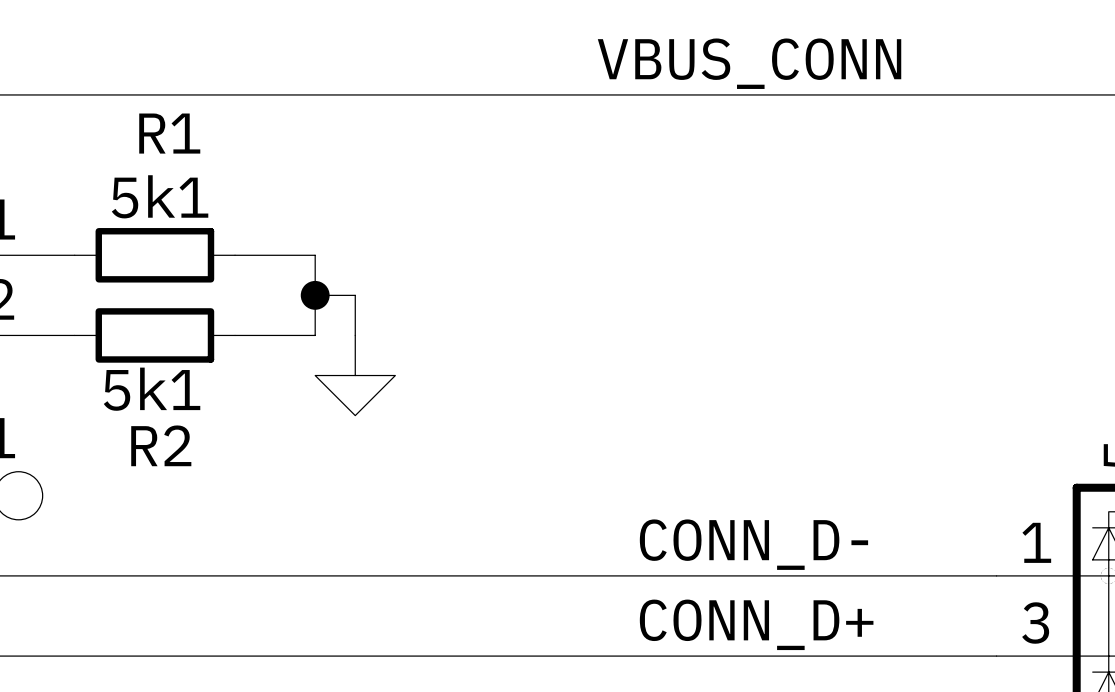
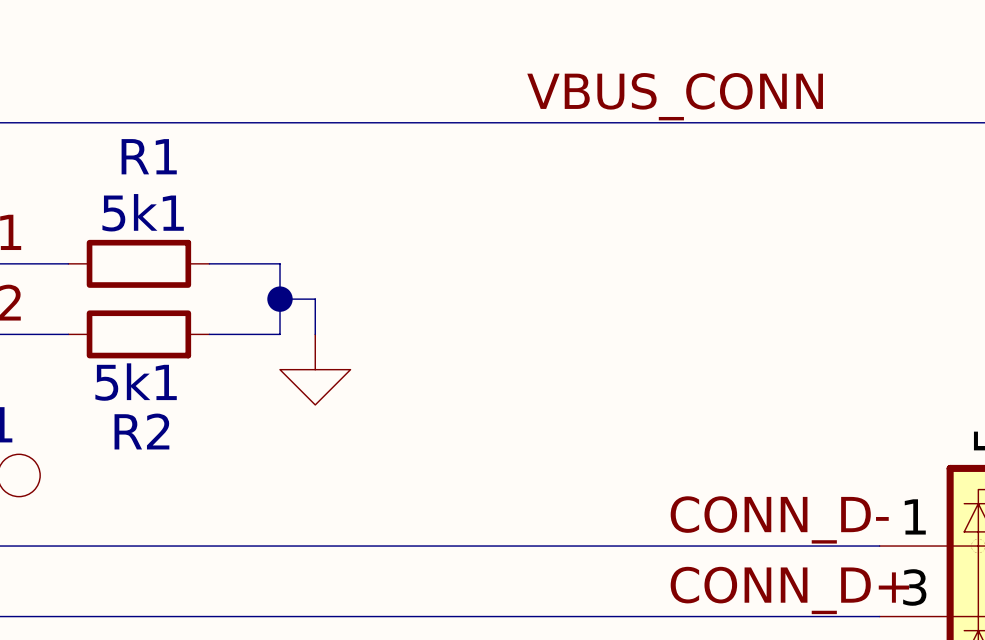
label position: CONN_D- (753, 544) -> CONN_D- (779, 519)
label position: CONN_D+ (756, 624) -> CONN_D+ (789, 590)

